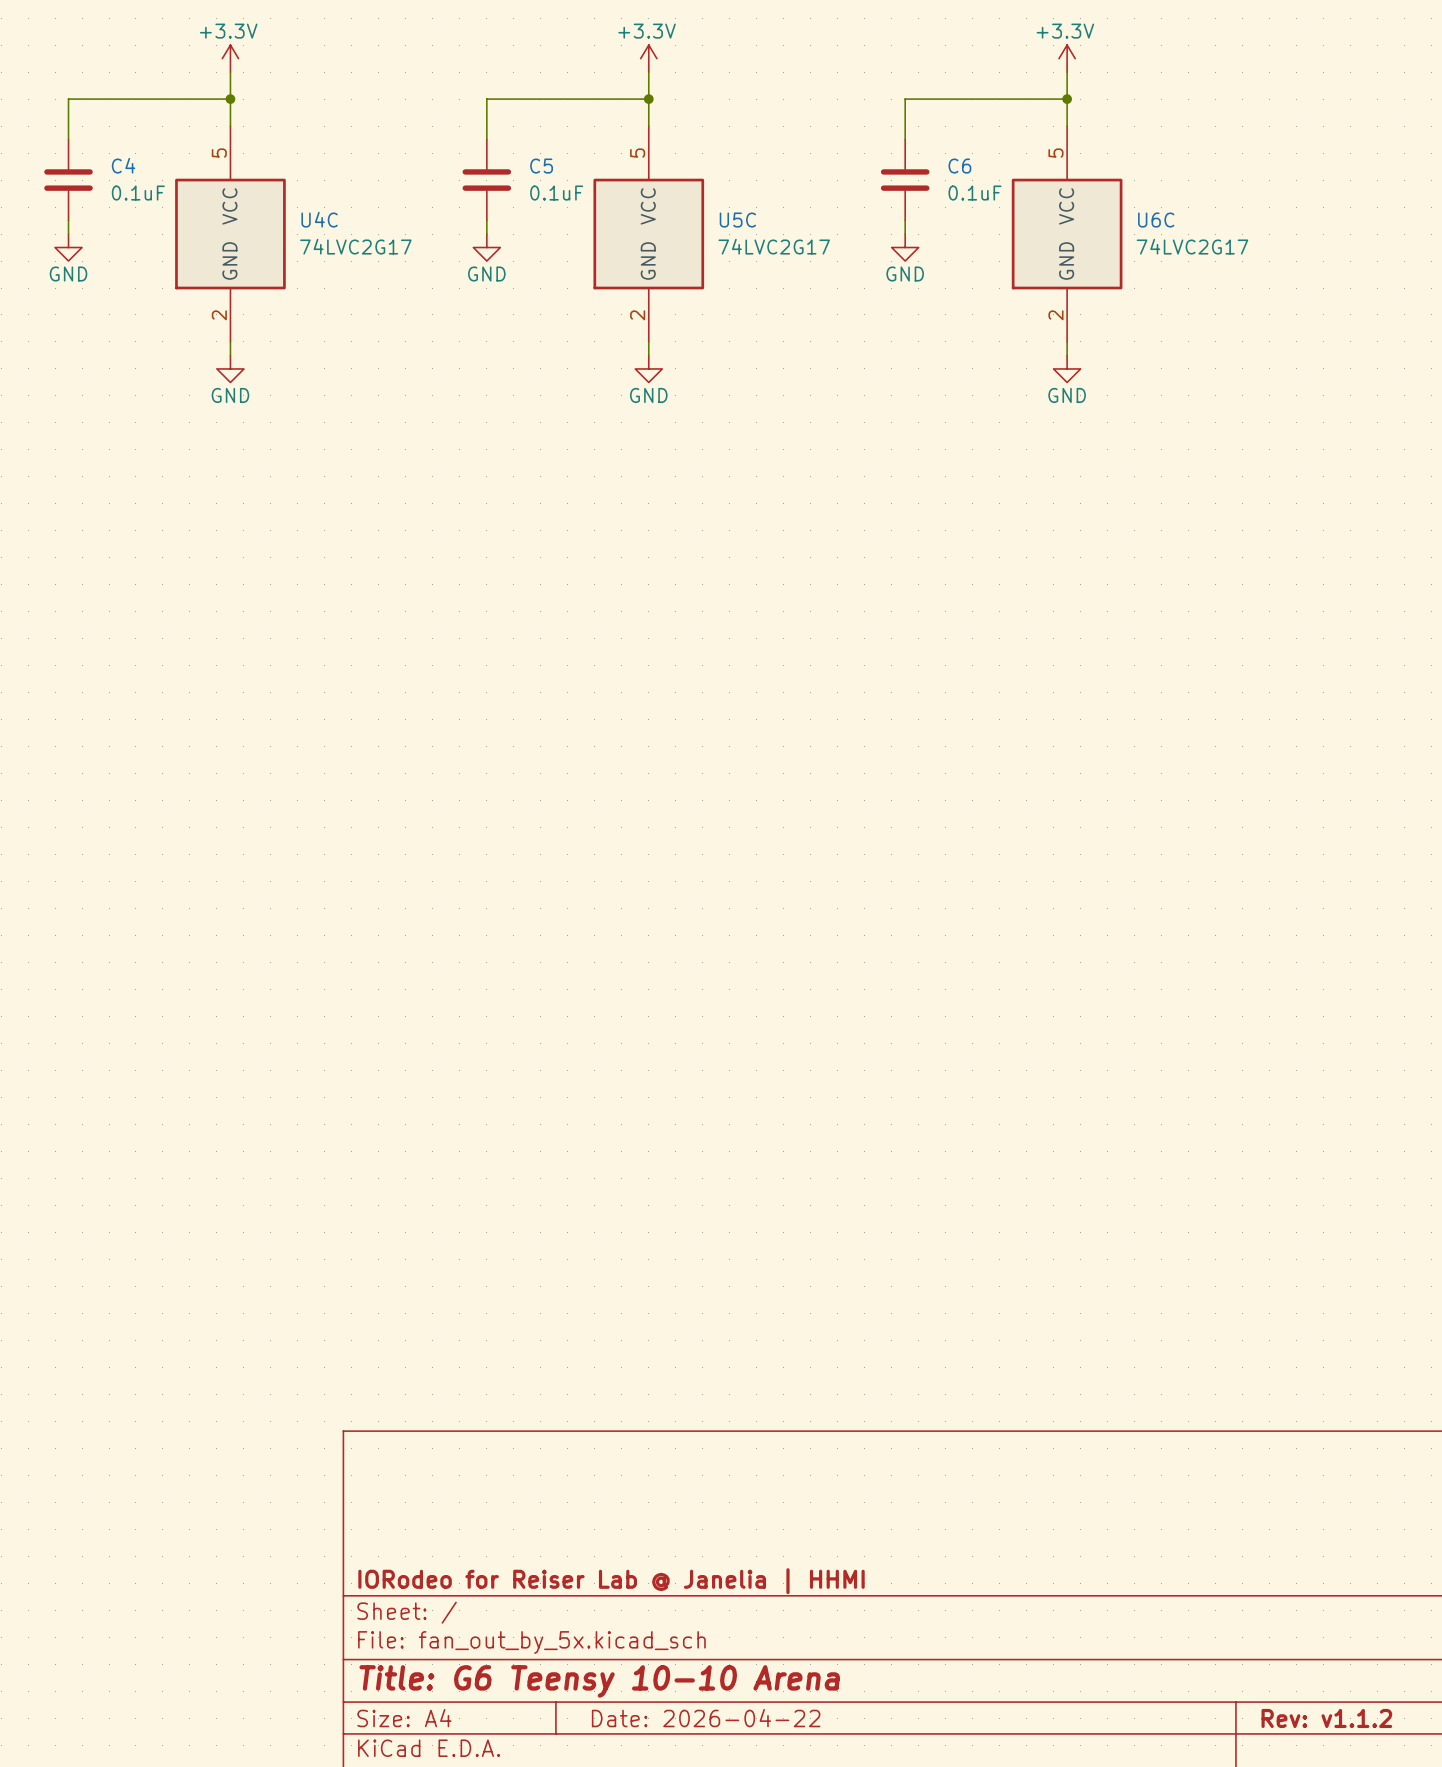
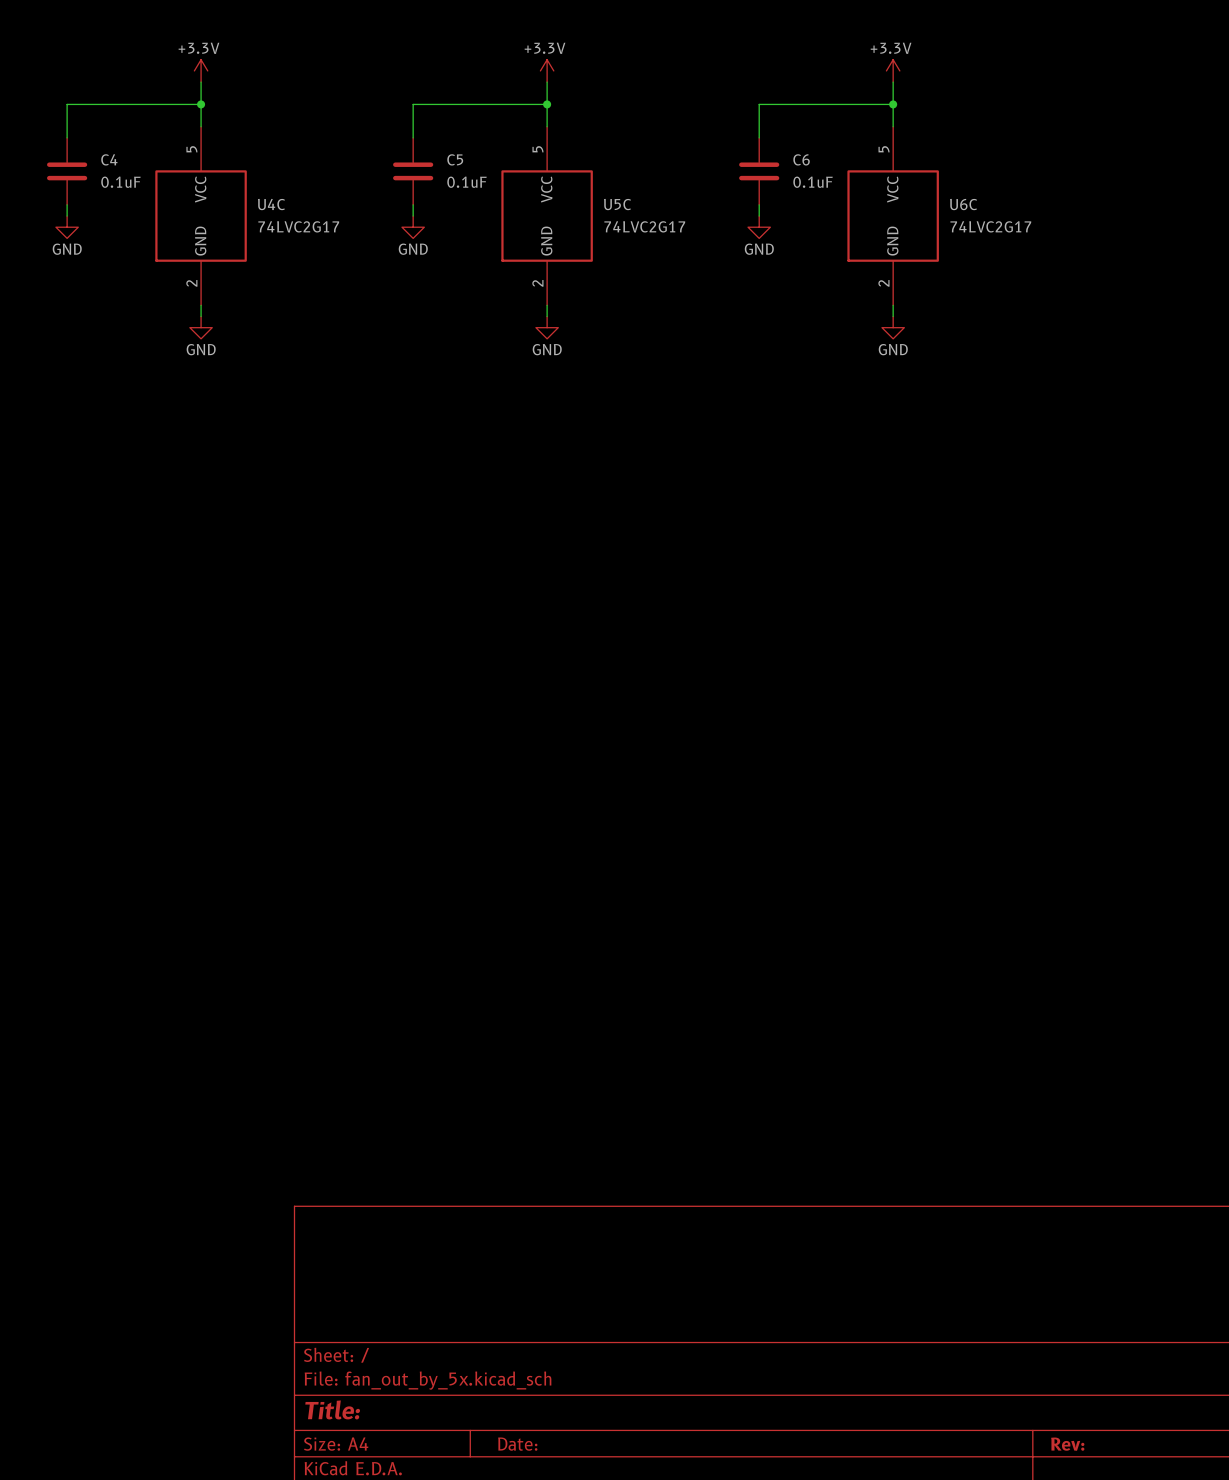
title block: IORodeo for Reiser Lab @ Janelia | HHMI (611, 1581) -> none
title block: Title: G6 Teensy 10-10 Arena (599, 1681) -> Title: (332, 1409)
title block: Date: 2026-04-22 (706, 1718) -> Date: (517, 1444)
title block: Rev: v1.1.2 (1326, 1718) -> Rev: (1067, 1444)

